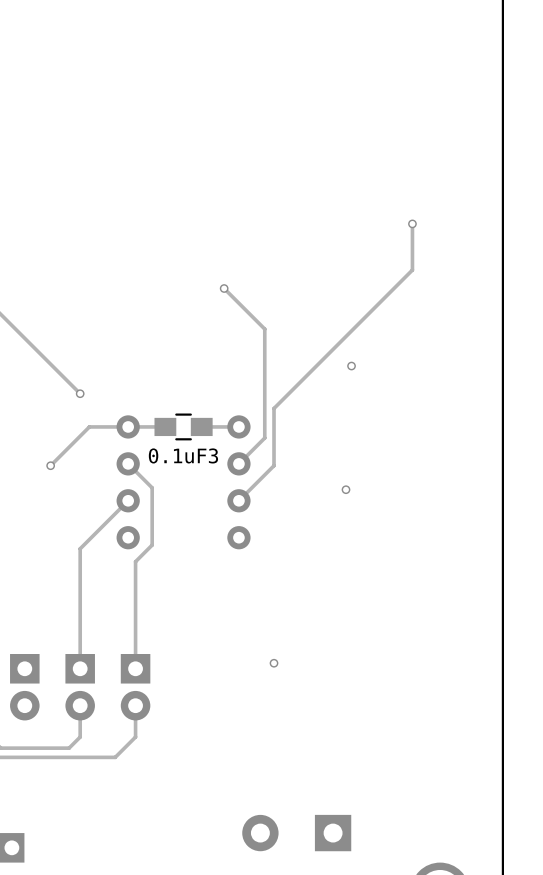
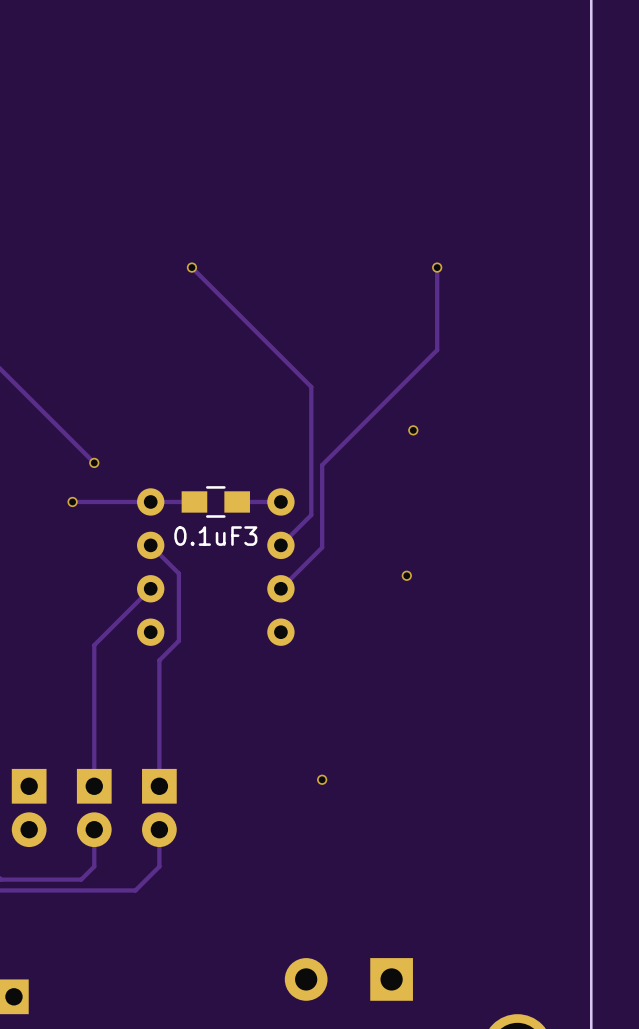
track: (412, 223) (412, 270) (274, 408) -> (437, 267) (437, 350) (322, 465) (322, 480)
via position: (412, 223) -> (437, 267)
track: none -> (191, 267) (263, 339)
via: none -> (191, 267)
via: (224, 288) -> none
track: (89, 426) (50, 465) -> (105, 501) (72, 501)
via position: (50, 465) -> (72, 501)

